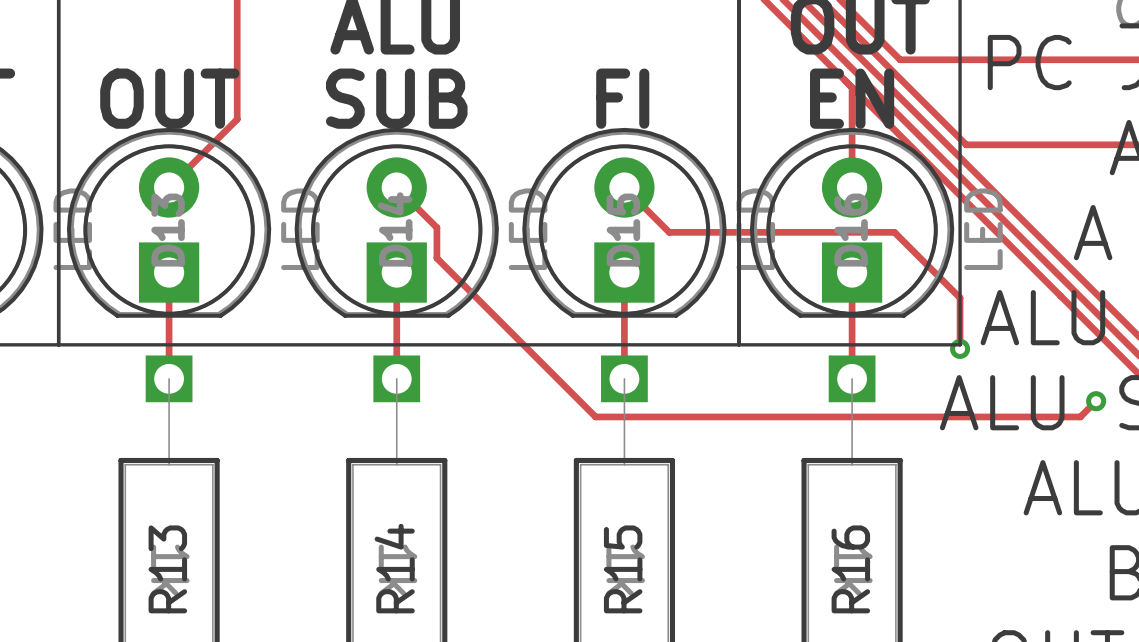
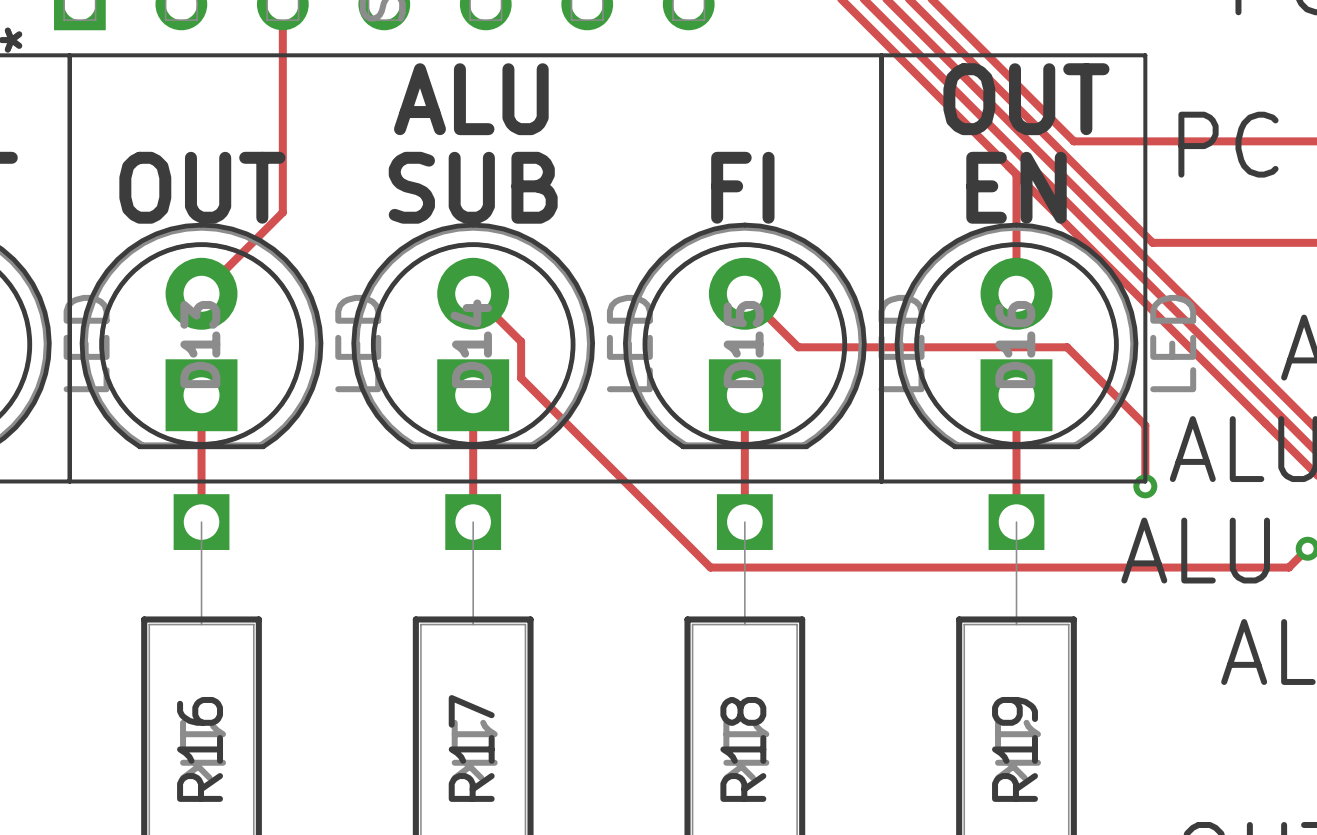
R14 name: R14 (394, 568) -> R17 (471, 748)
R13 name: R13 (167, 569) -> R16 (200, 749)
R15 name: R15 (623, 569) -> R18 (743, 749)
R16 name: R16 (850, 569) -> R19 (1015, 749)

